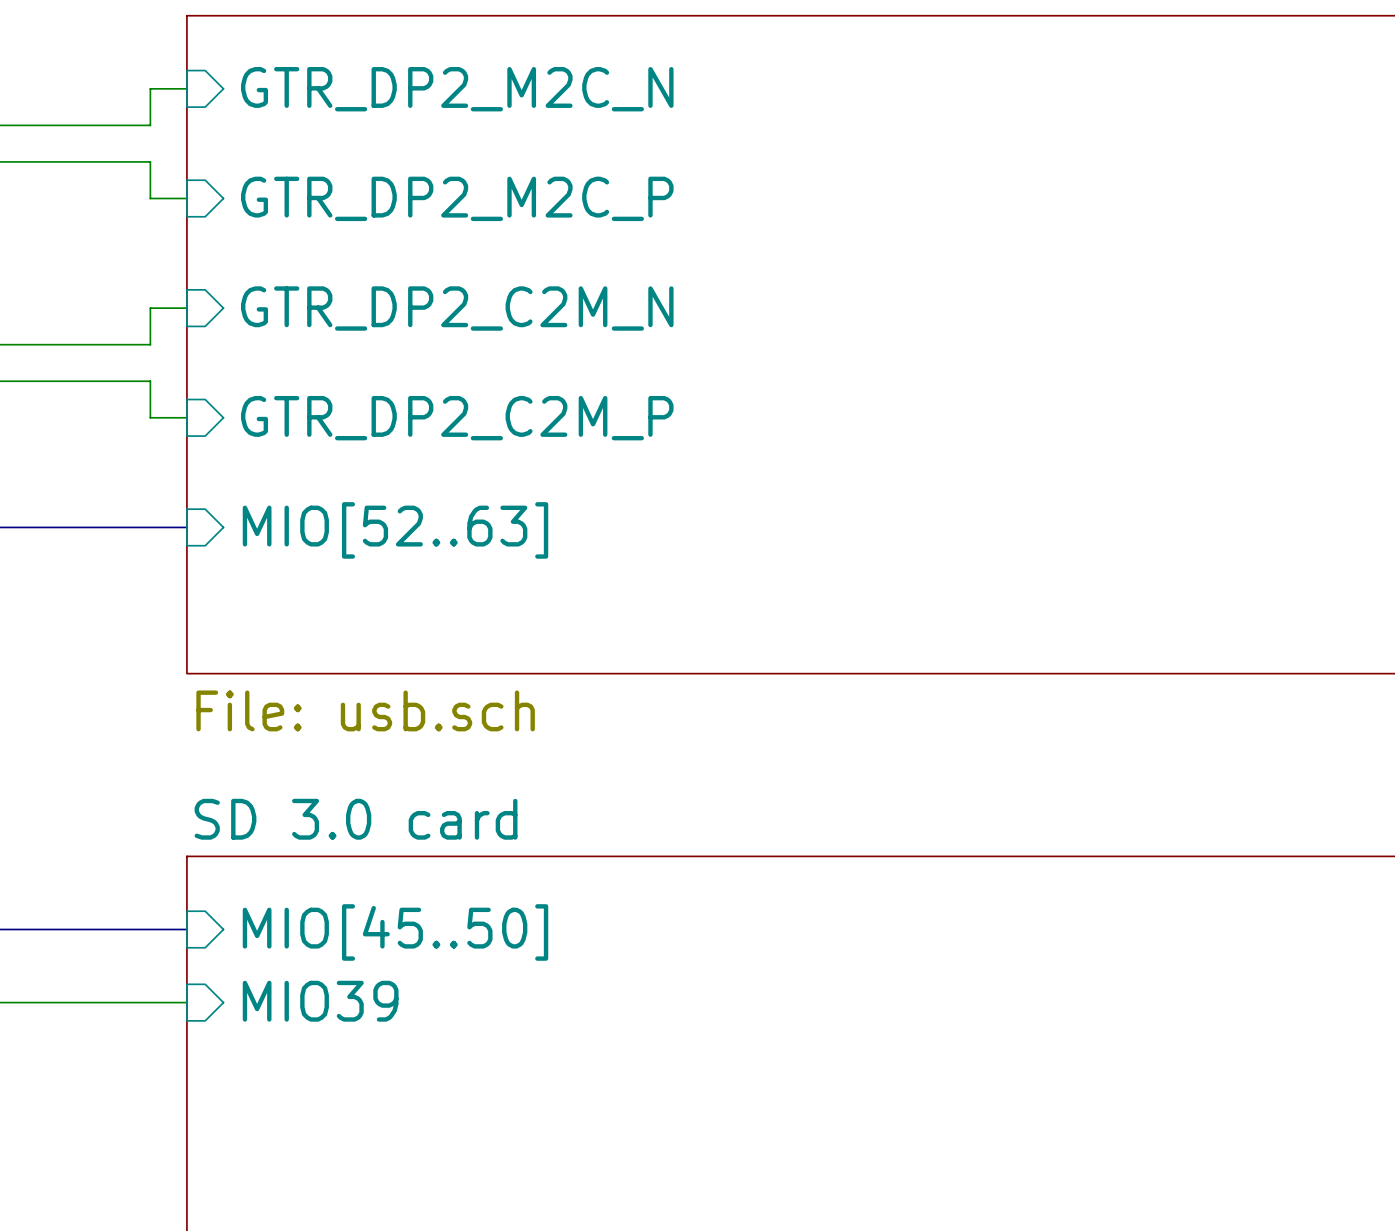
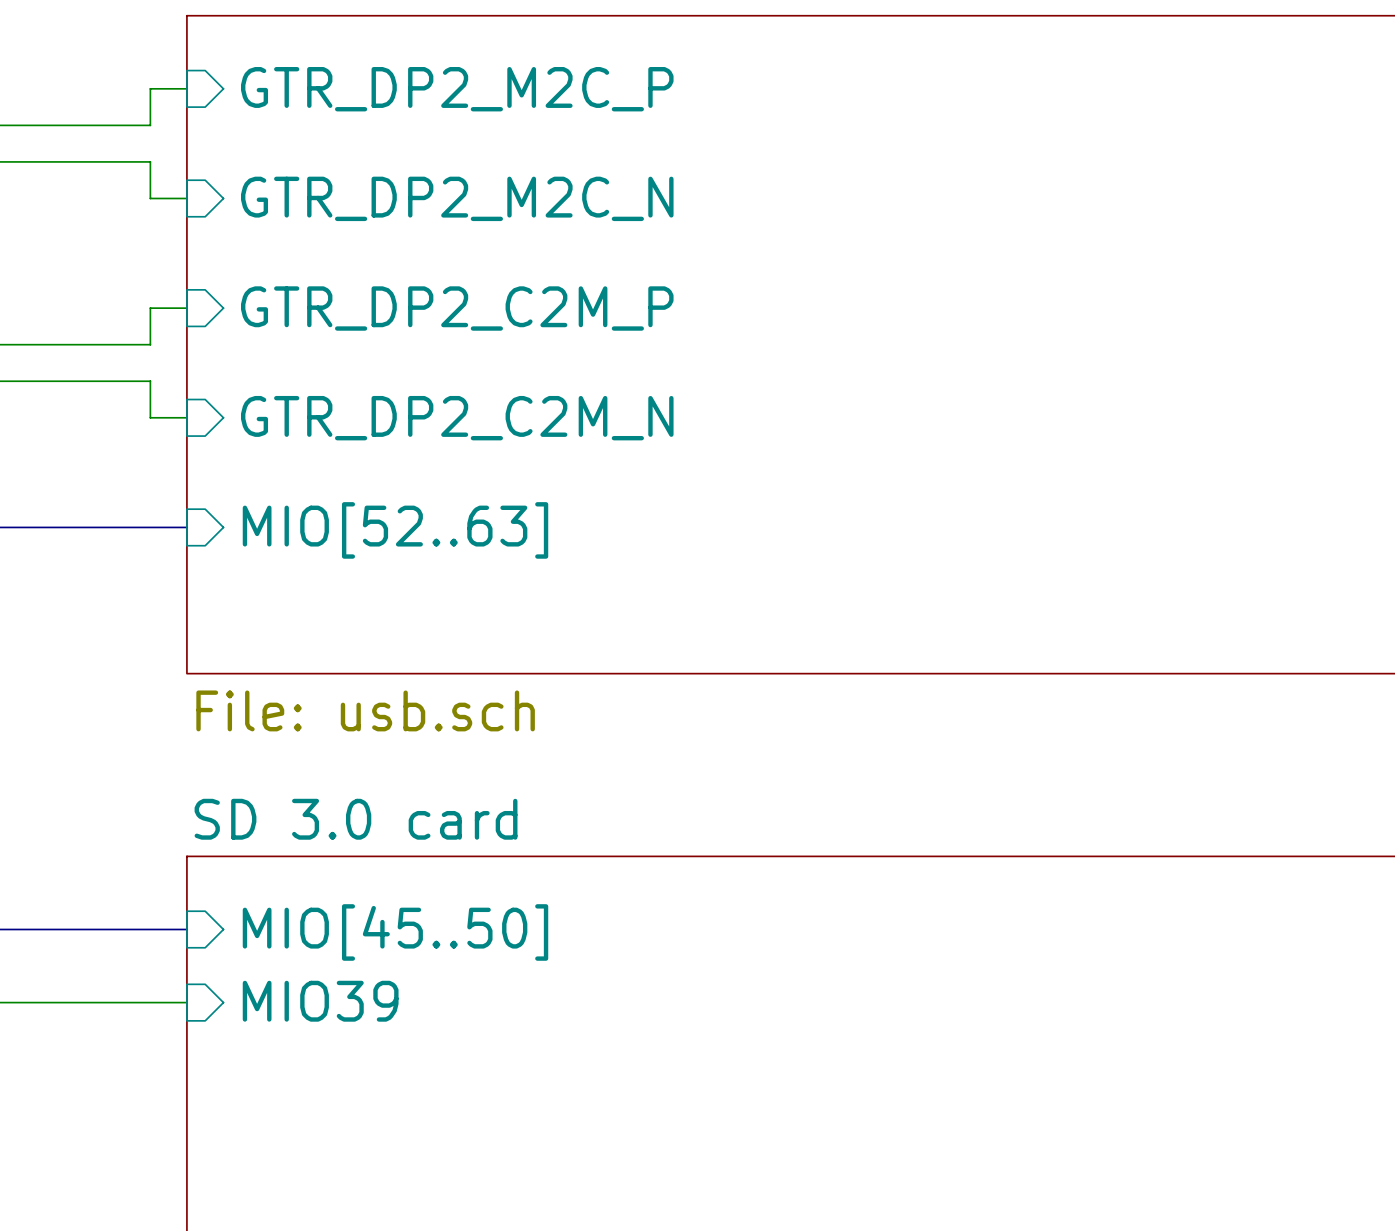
sheet pin: GTR_DP2_M2C_N (457, 89) -> GTR_DP2_M2C_P (457, 89)
sheet pin: GTR_DP2_M2C_P (457, 198) -> GTR_DP2_M2C_N (457, 198)
sheet pin: GTR_DP2_C2M_N (457, 308) -> GTR_DP2_C2M_P (457, 308)
sheet pin: GTR_DP2_C2M_P (457, 418) -> GTR_DP2_C2M_N (457, 418)

